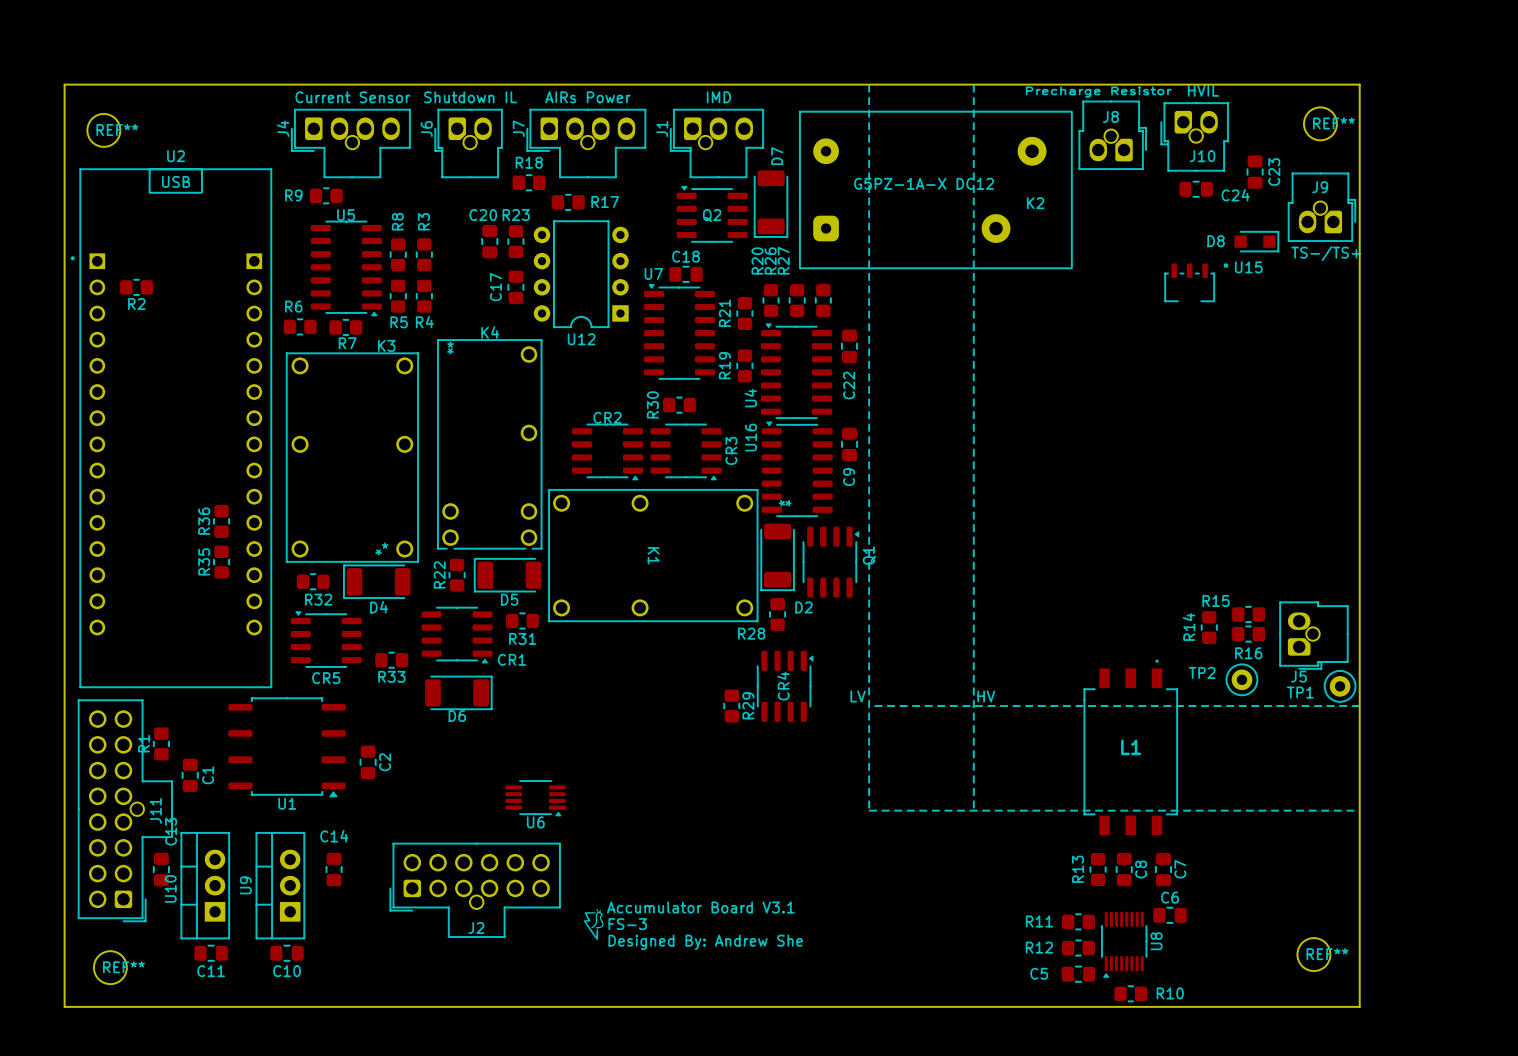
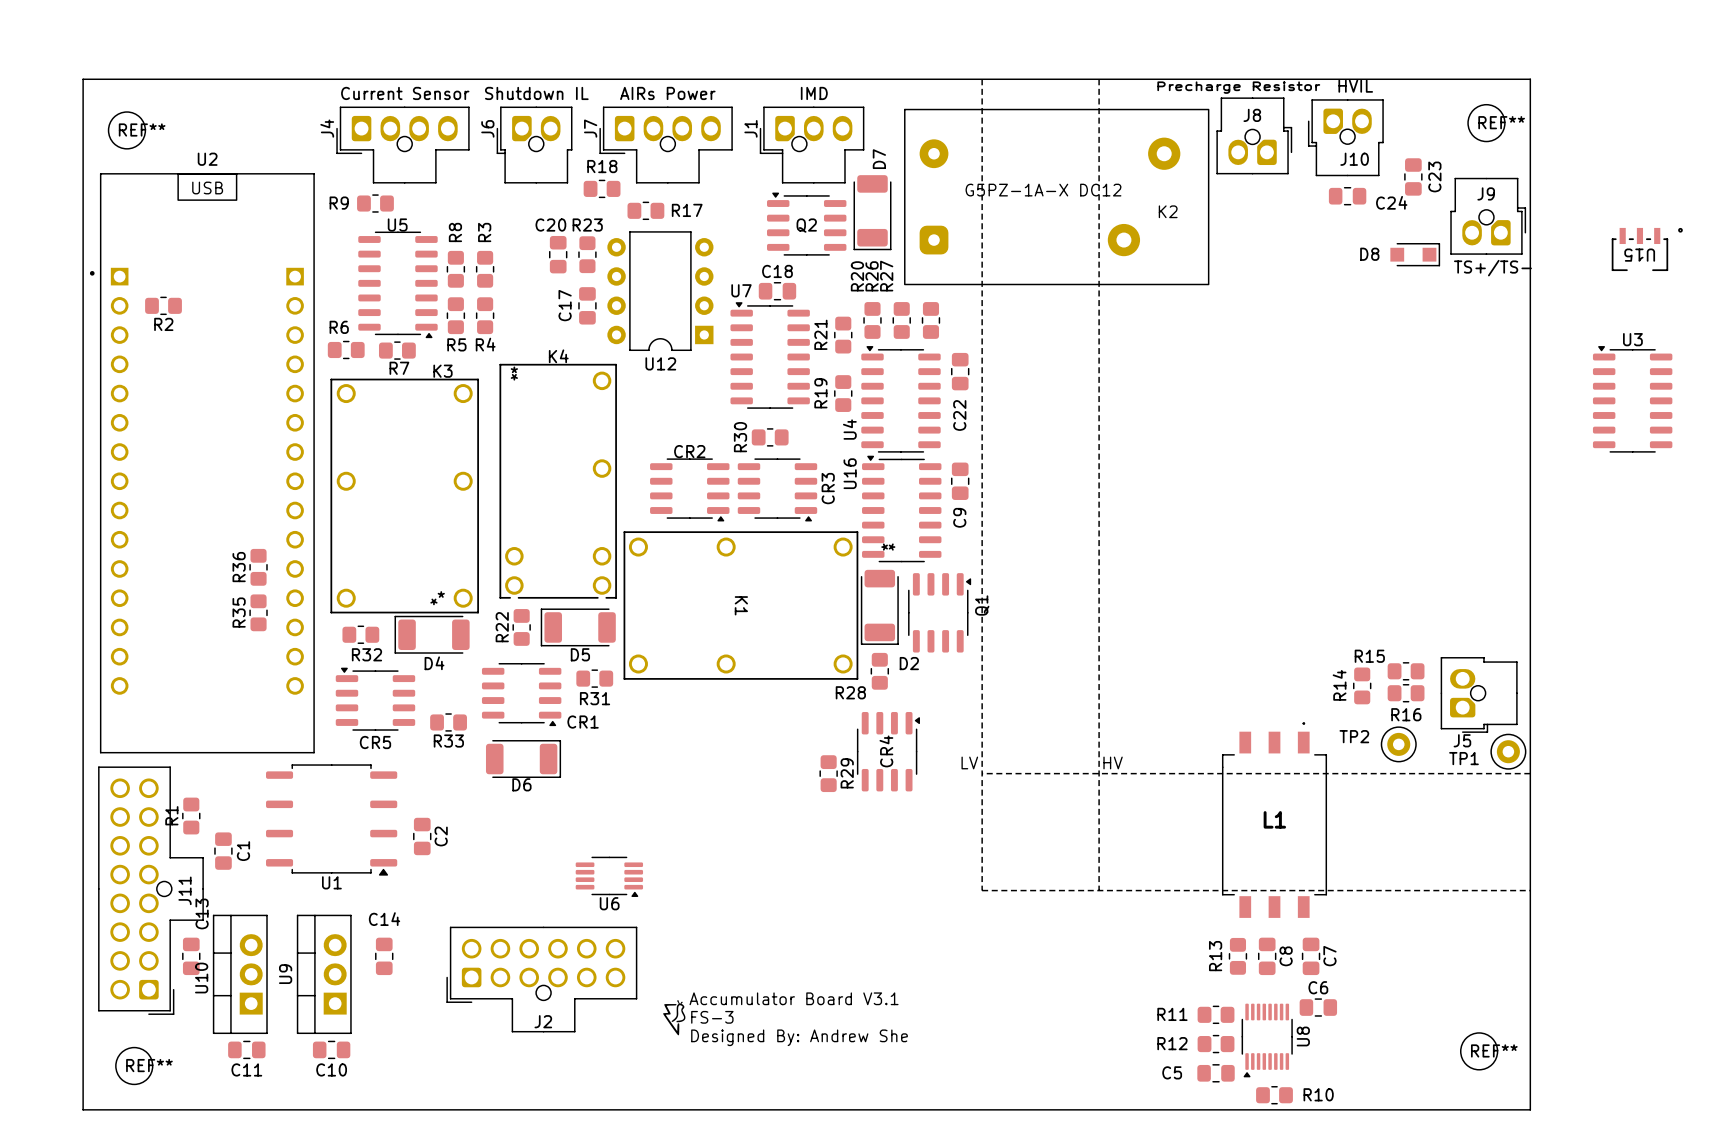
J9 value: TS-/TS+ (1326, 253) -> TS+/TS- (1492, 268)
U15 name rotation: 0° (1248, 267) -> 180° (1639, 255)
U15 name position: U15 (1248, 267) -> U15 (1639, 255)
U15 position: (1196, 282) -> (1647, 249)
U3: none -> (1632, 399)

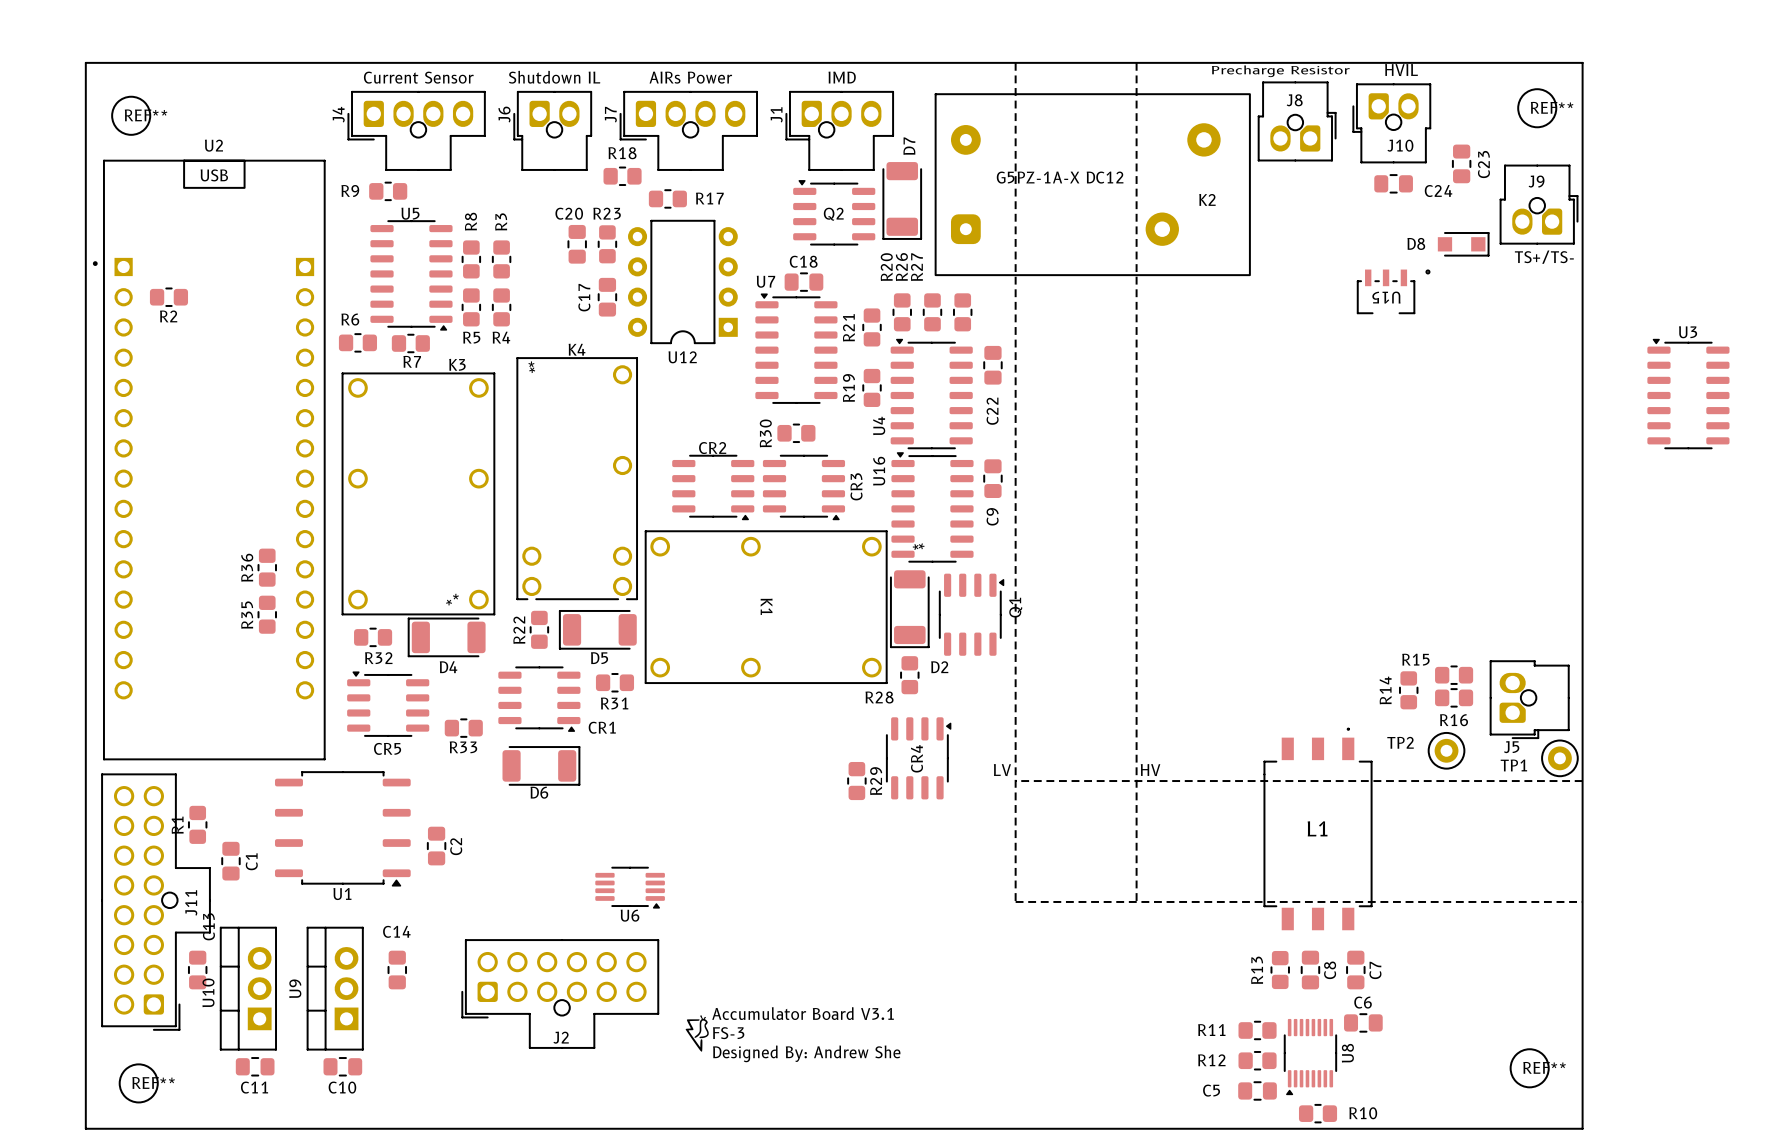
U15 position: (1647, 249) -> (1393, 291)

